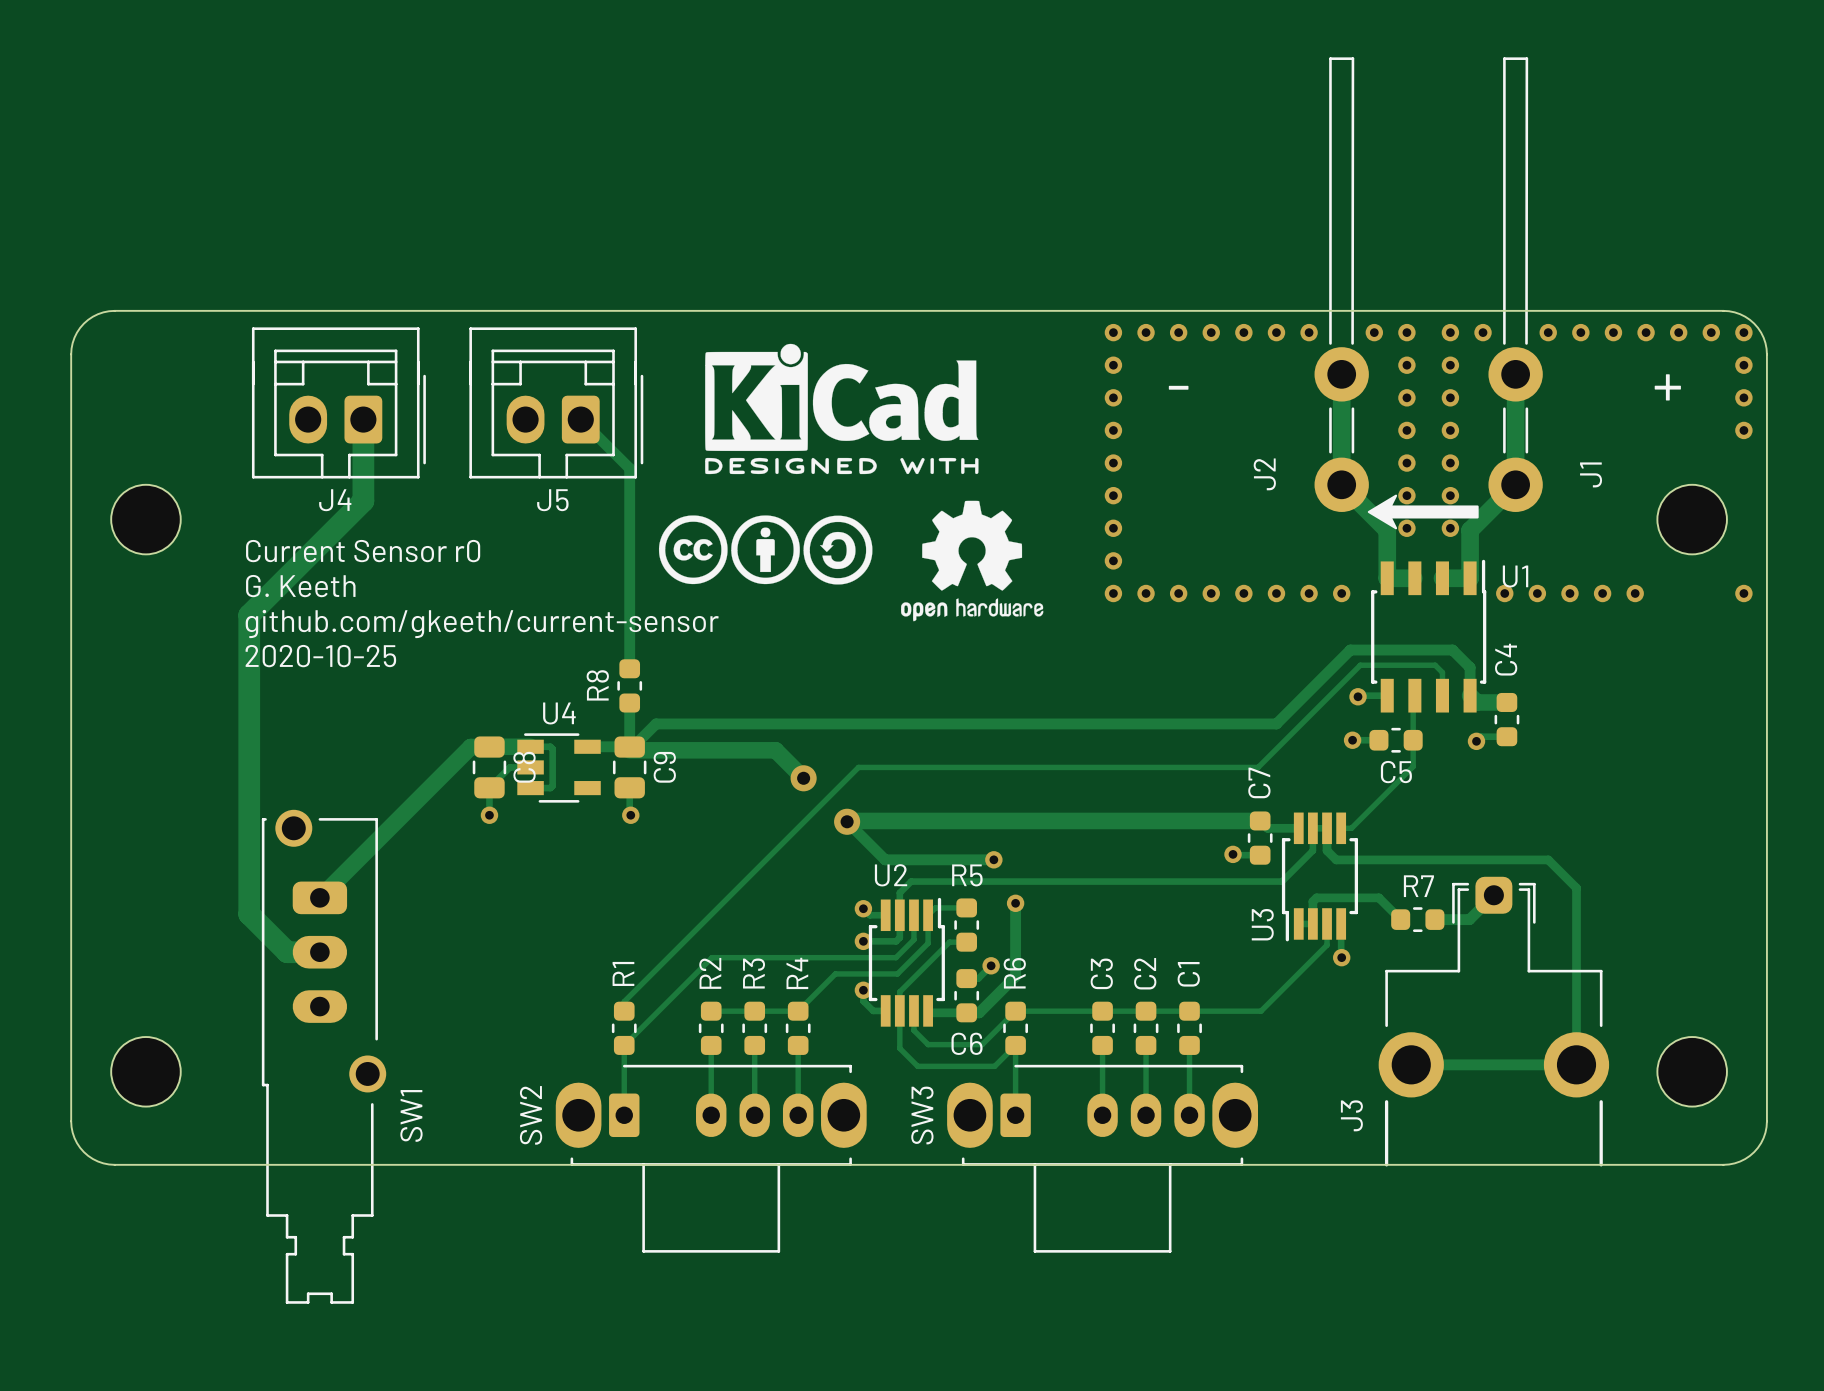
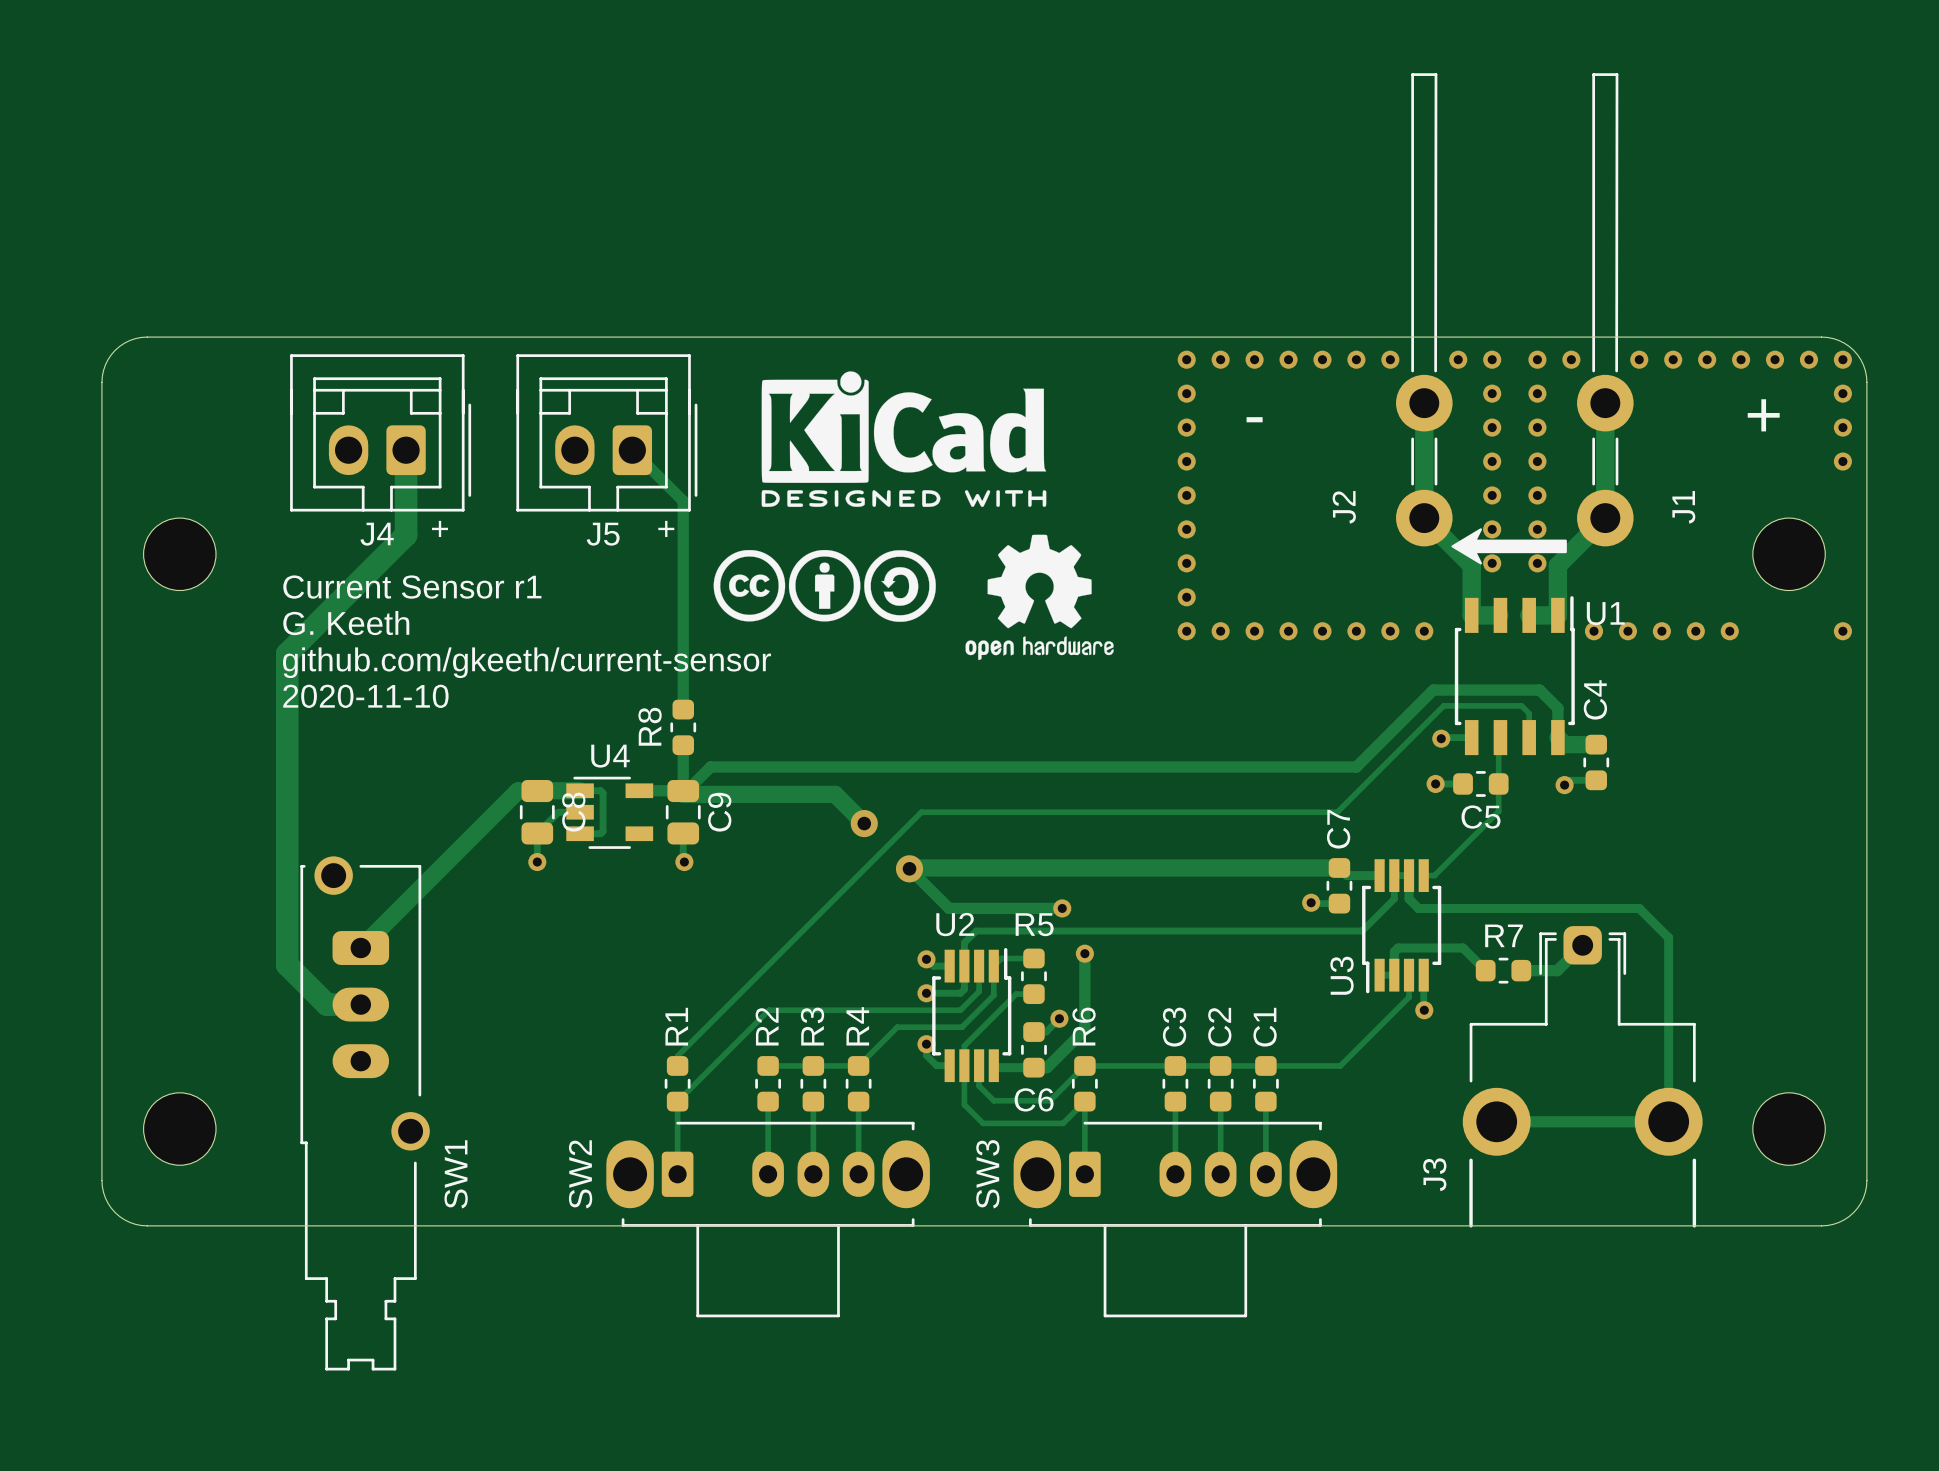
J4 text: none -> + (440, 528)
J5 text: none -> + (666, 528)
text: Current Sensor r0 (363, 551) -> Current Sensor r1 (412, 587)
text: 2020-10-25 (320, 656) -> 2020-11-10 (365, 696)

